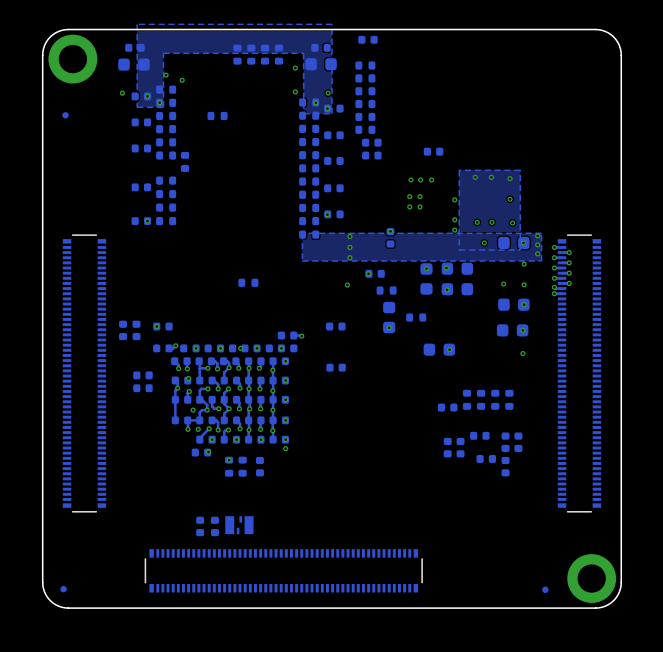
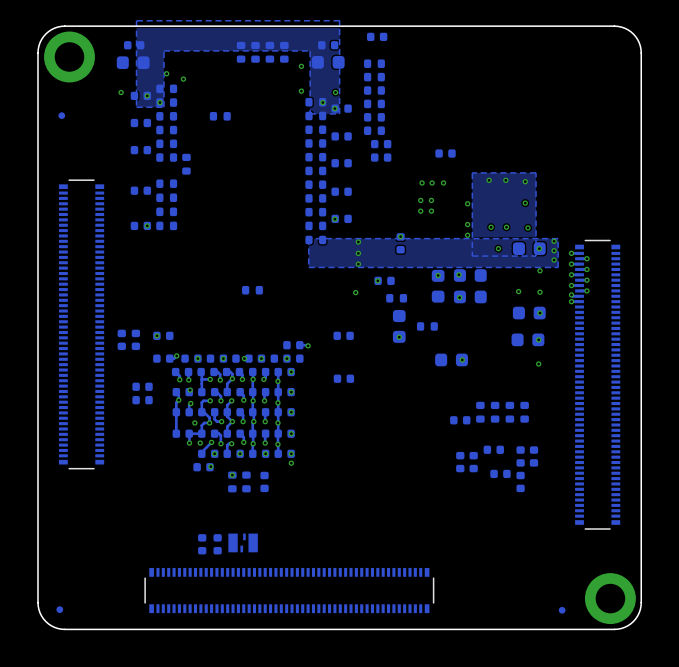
part position: (84, 373) -> (81, 324)

